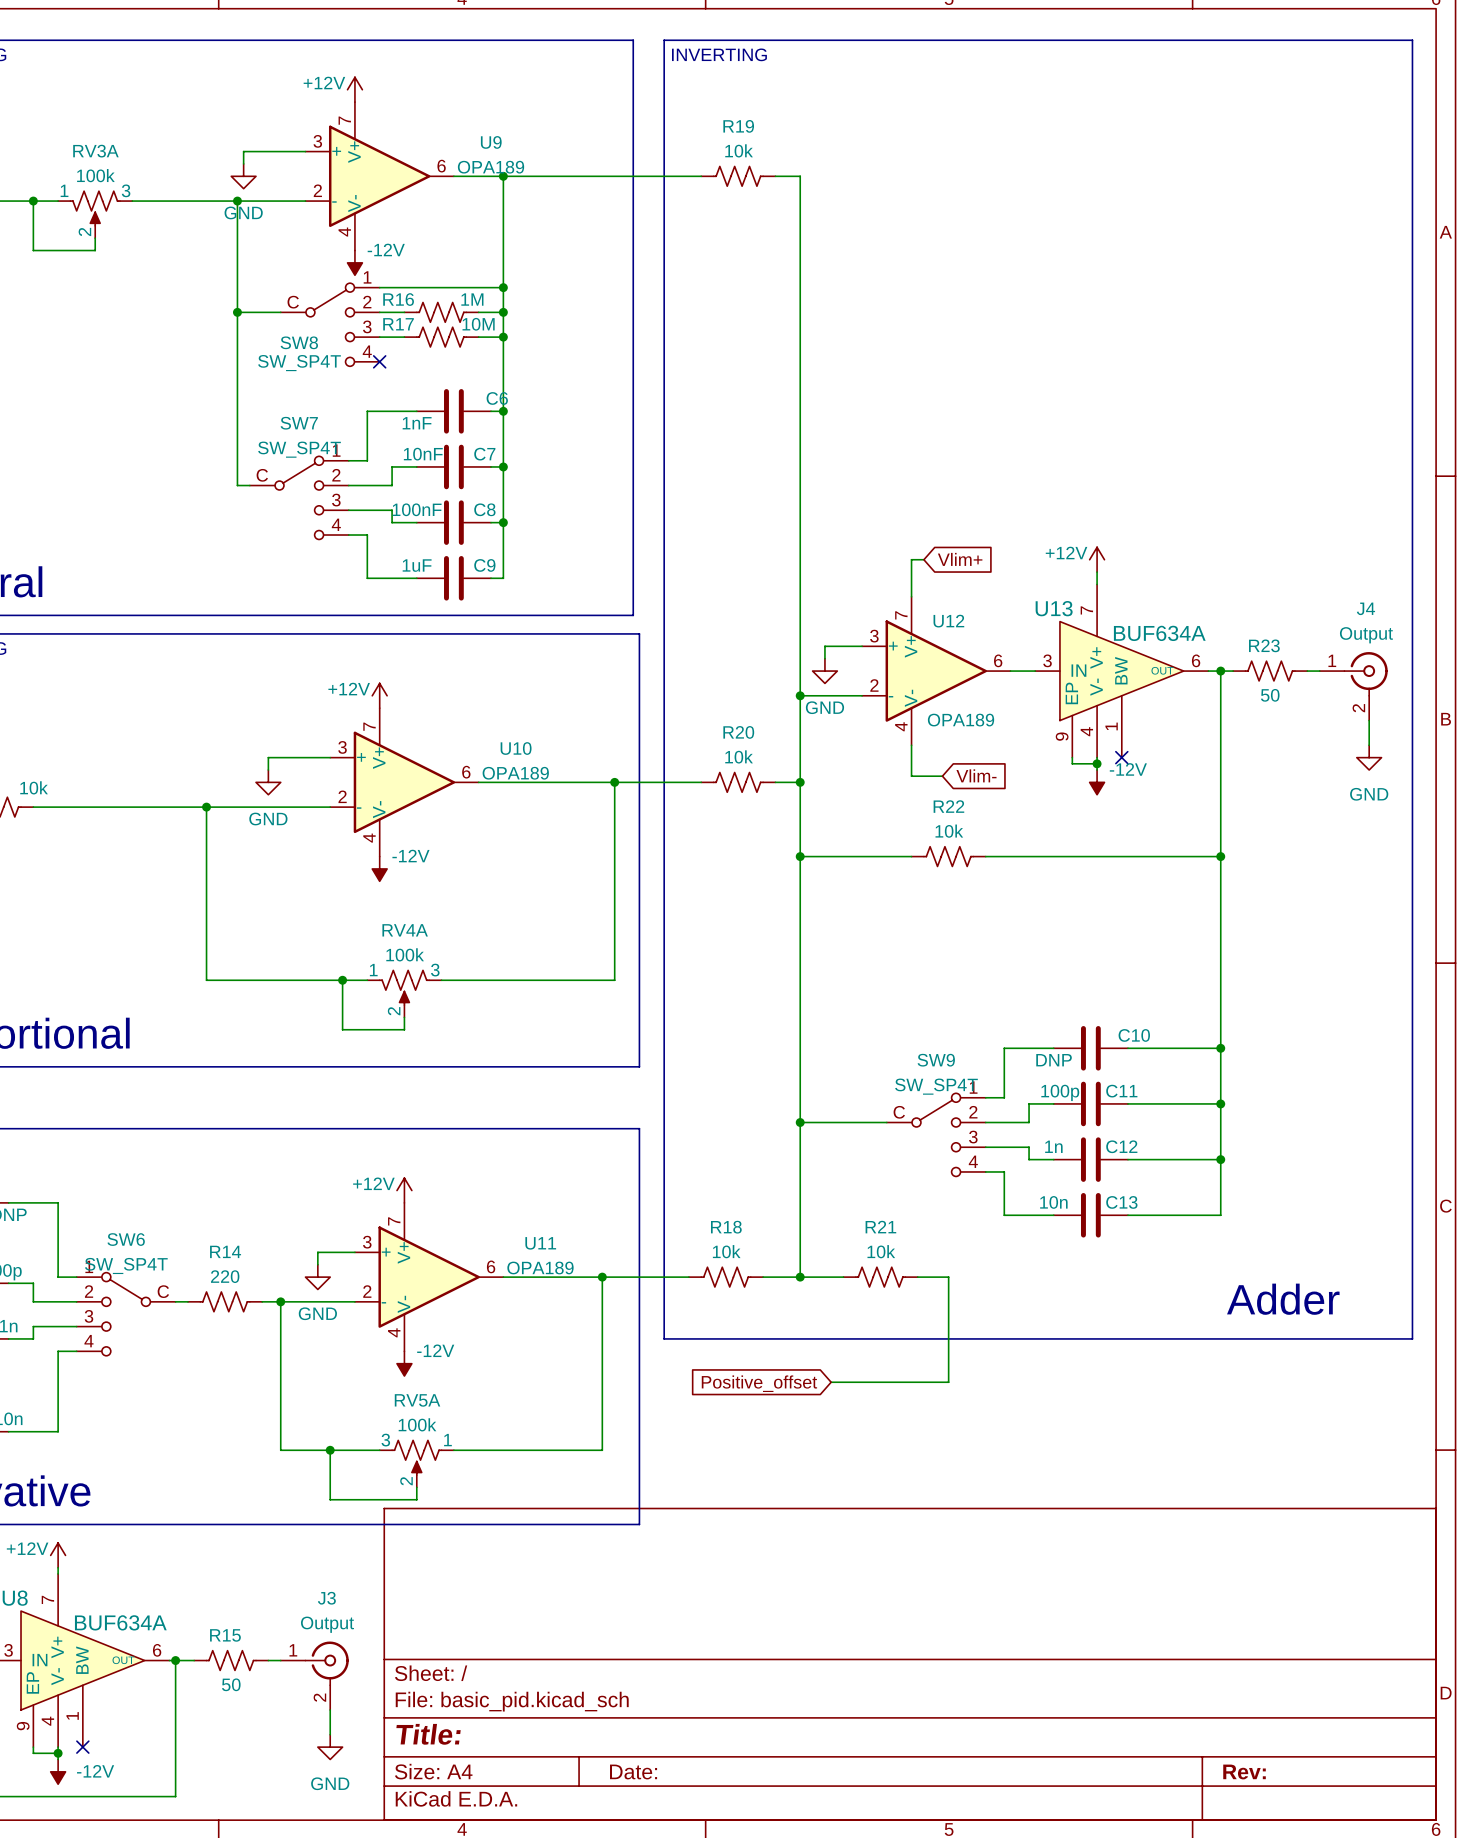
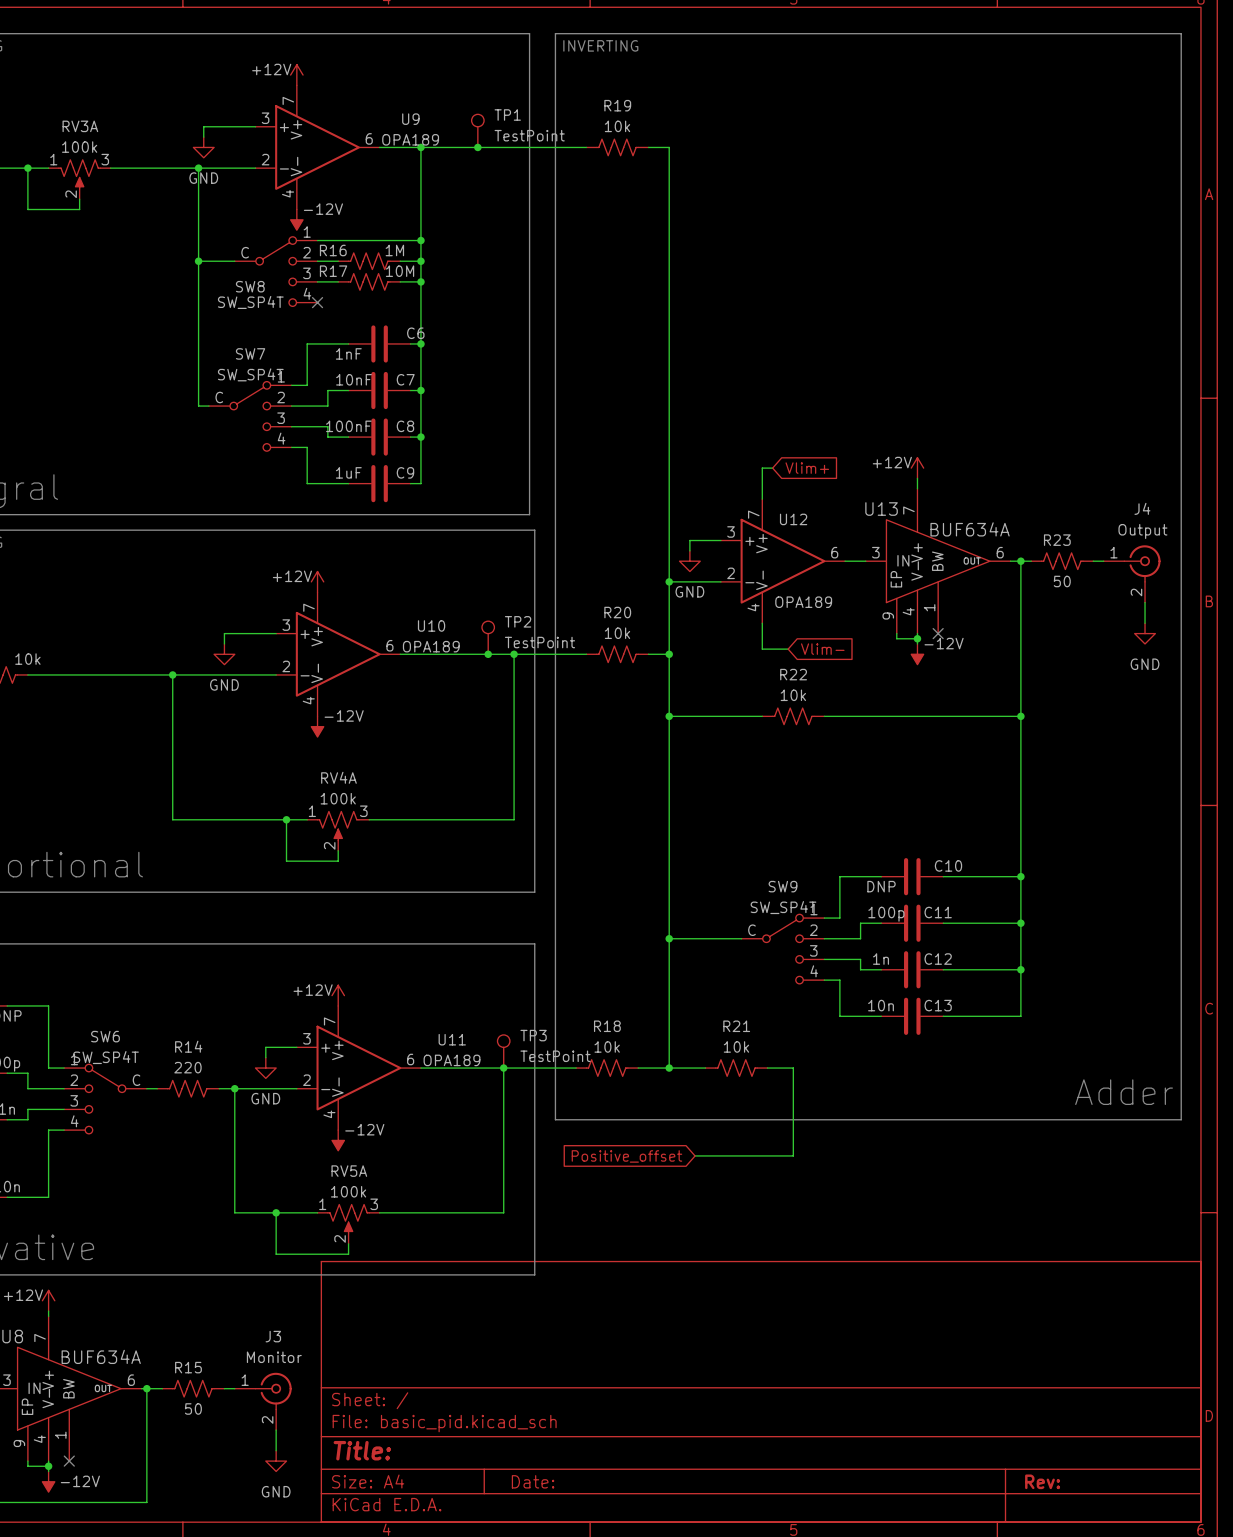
TP1: none -> TestPoint (477, 130)
junction: none -> (477, 147)
TP2: none -> TestPoint (488, 637)
junction: none -> (488, 654)
TP3: none -> TestPoint (503, 1051)
text position: Adder (1283, 1299) -> Adder (1124, 1092)
RV5A flip: as is (416, 1457) -> left-right (348, 1219)
J3 value: Output (327, 1624) -> Monitor (274, 1357)

